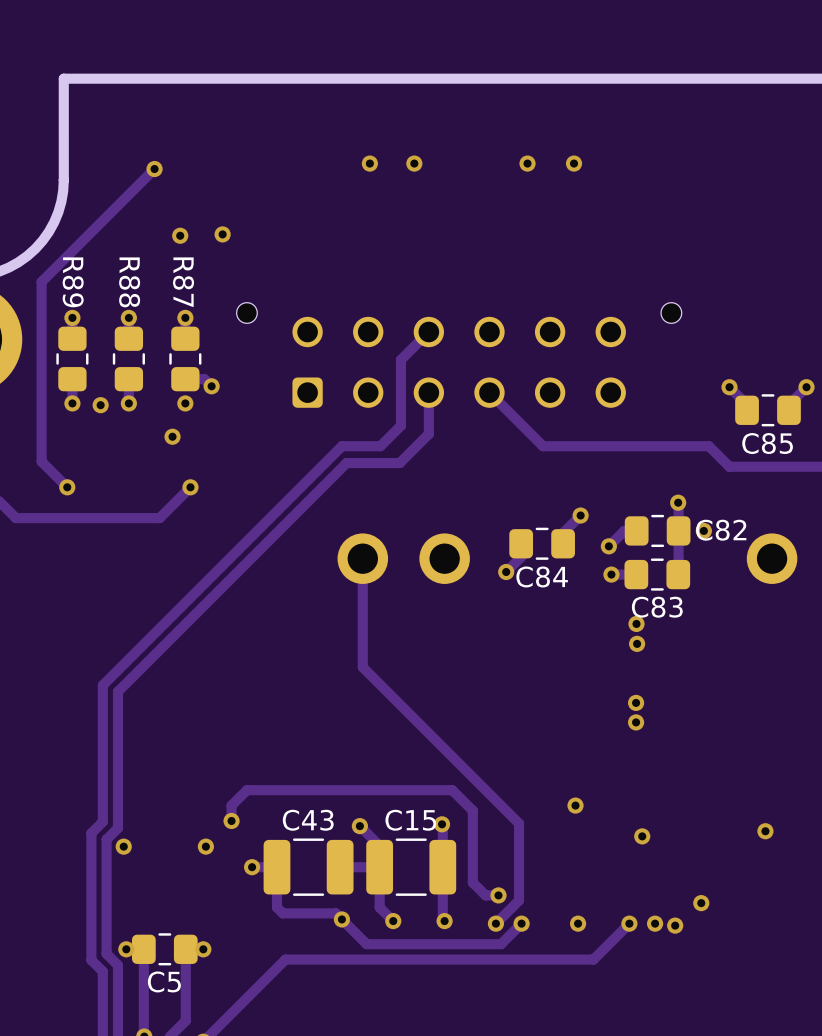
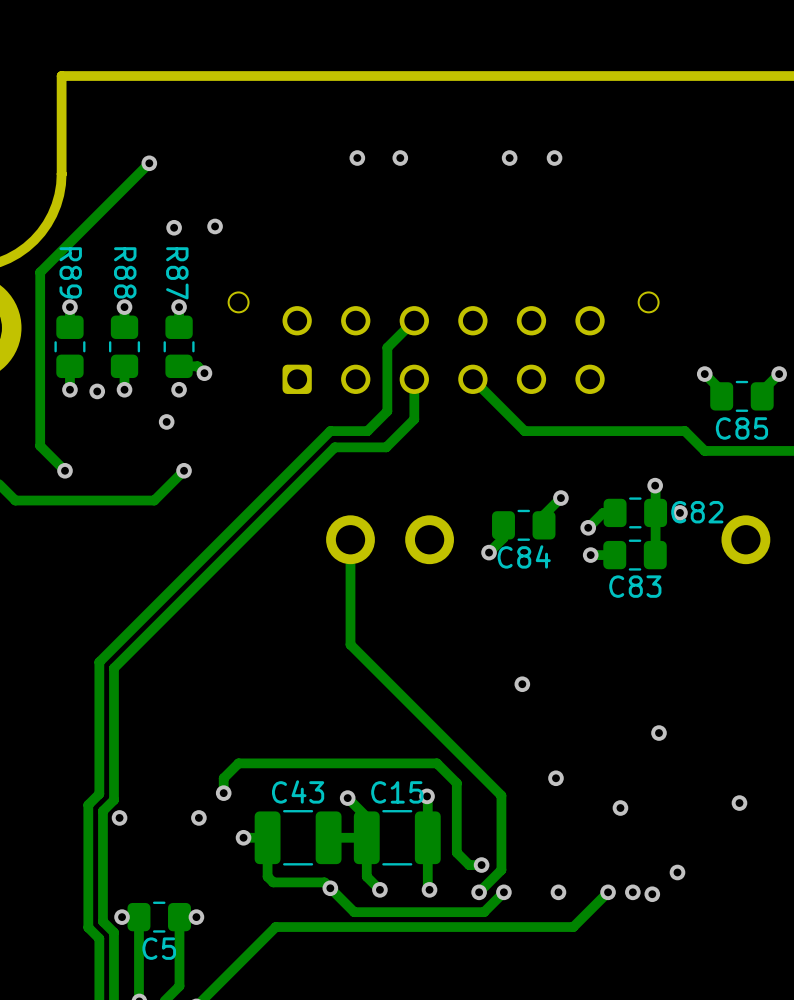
via: (636, 623) -> none
via: (637, 643) -> none
via: (636, 702) -> none
via: none -> (522, 684)
via: (636, 722) -> none
via: none -> (659, 733)

